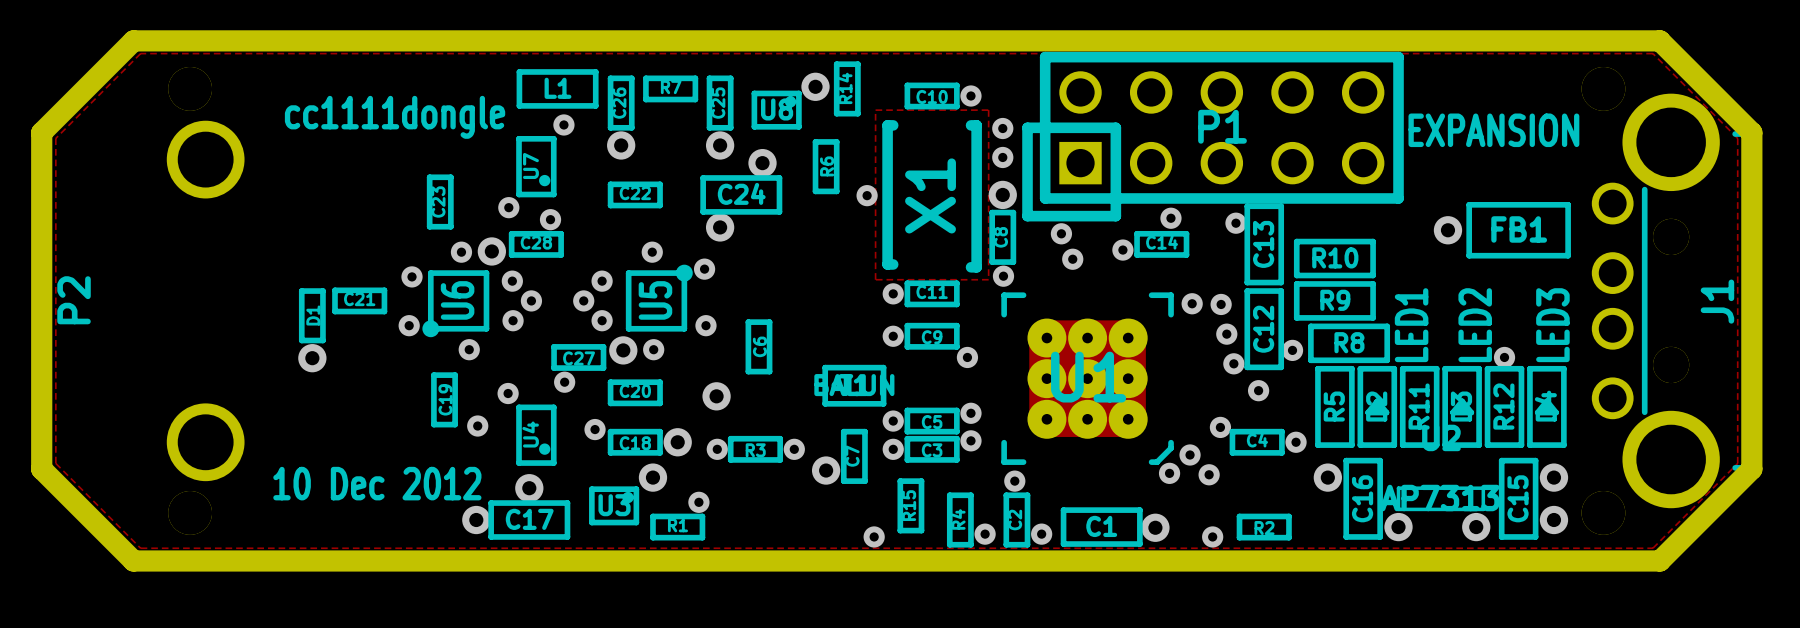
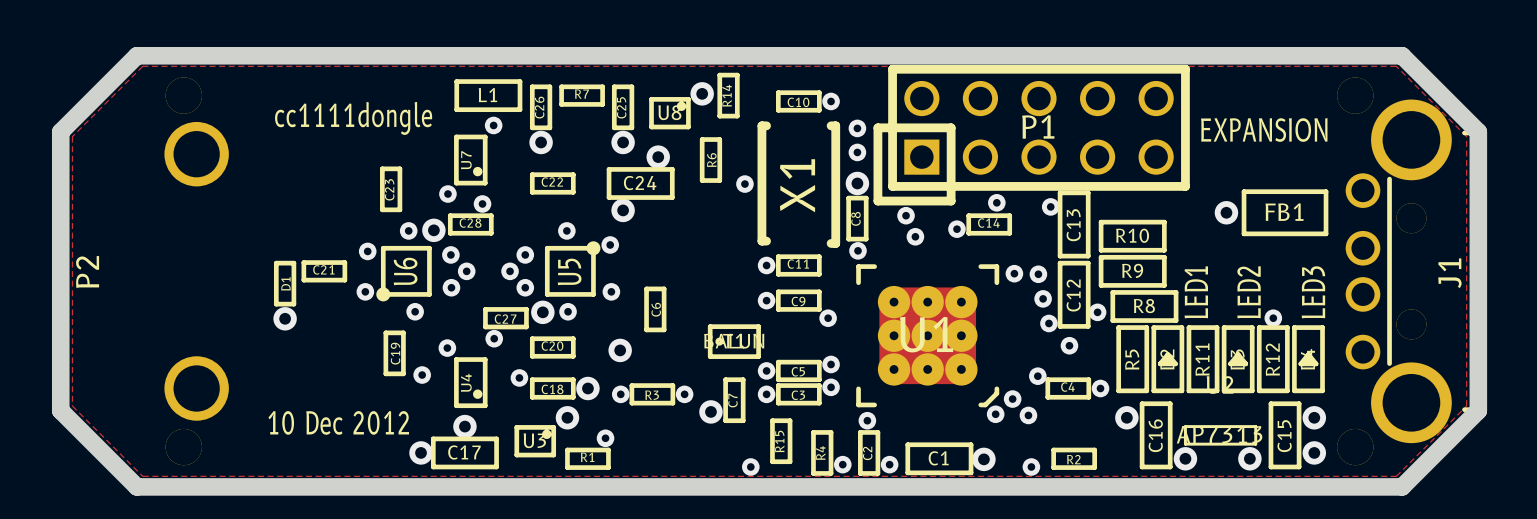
zone outline: (875, 110) (988, 110) (988, 279) (875, 279) (875, 110) -> none

